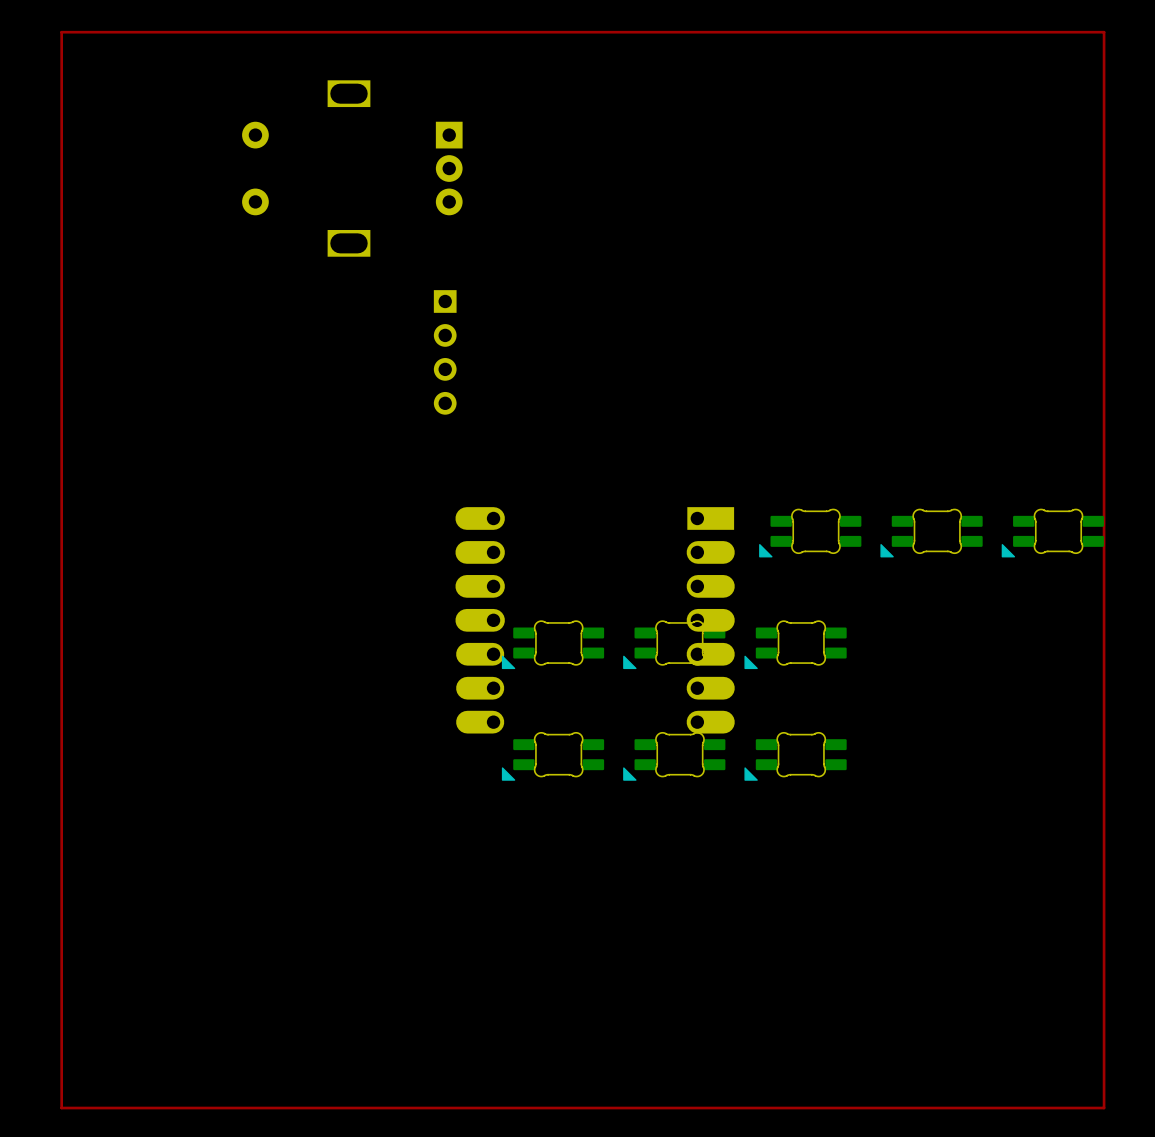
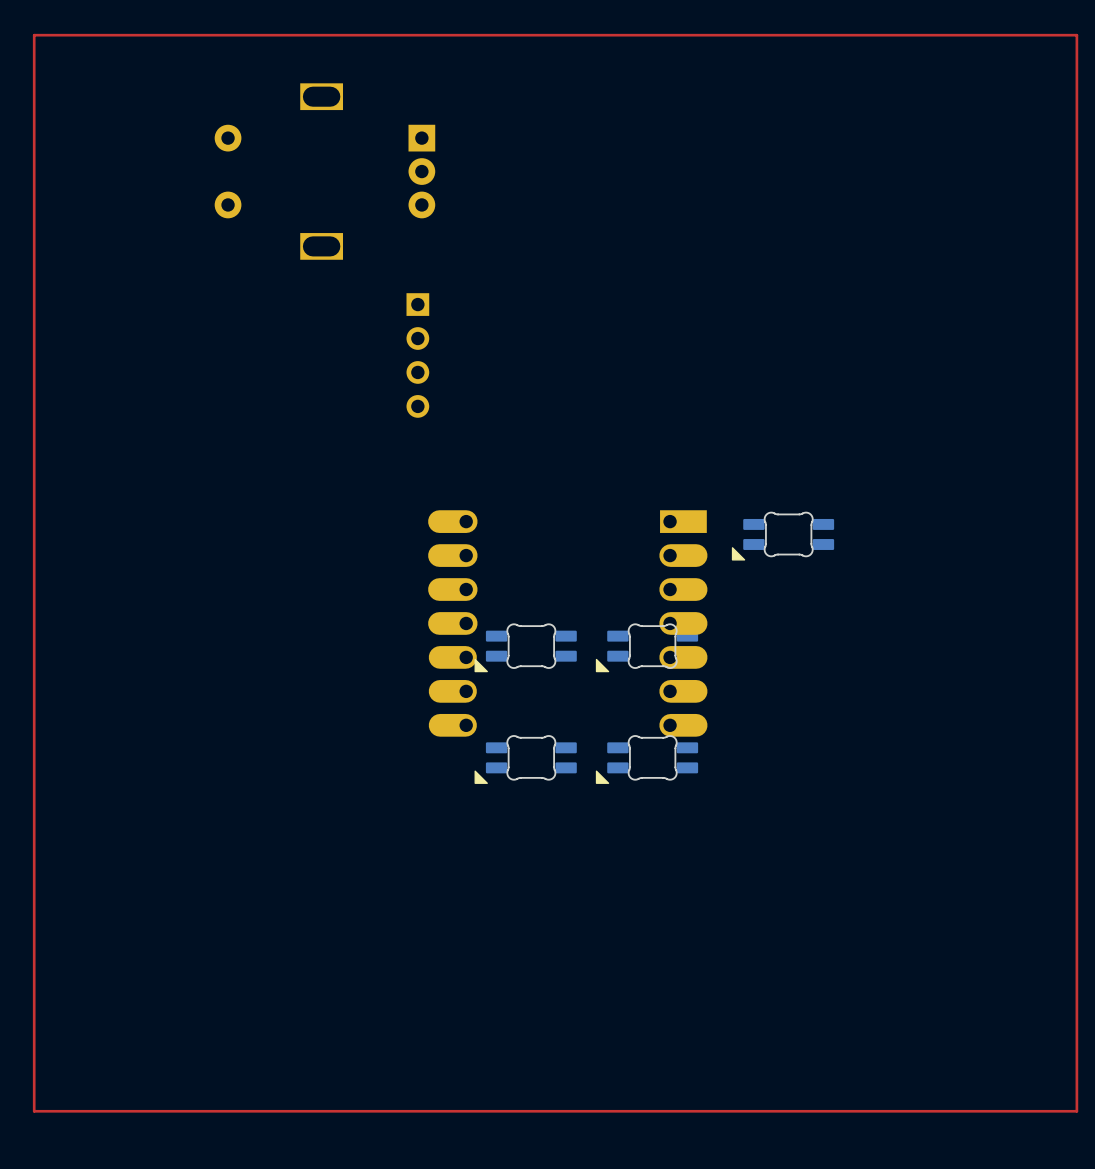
part: (931, 533) -> none
part: (1052, 533) -> none
part: (795, 644) -> none
part: (795, 756) -> none

